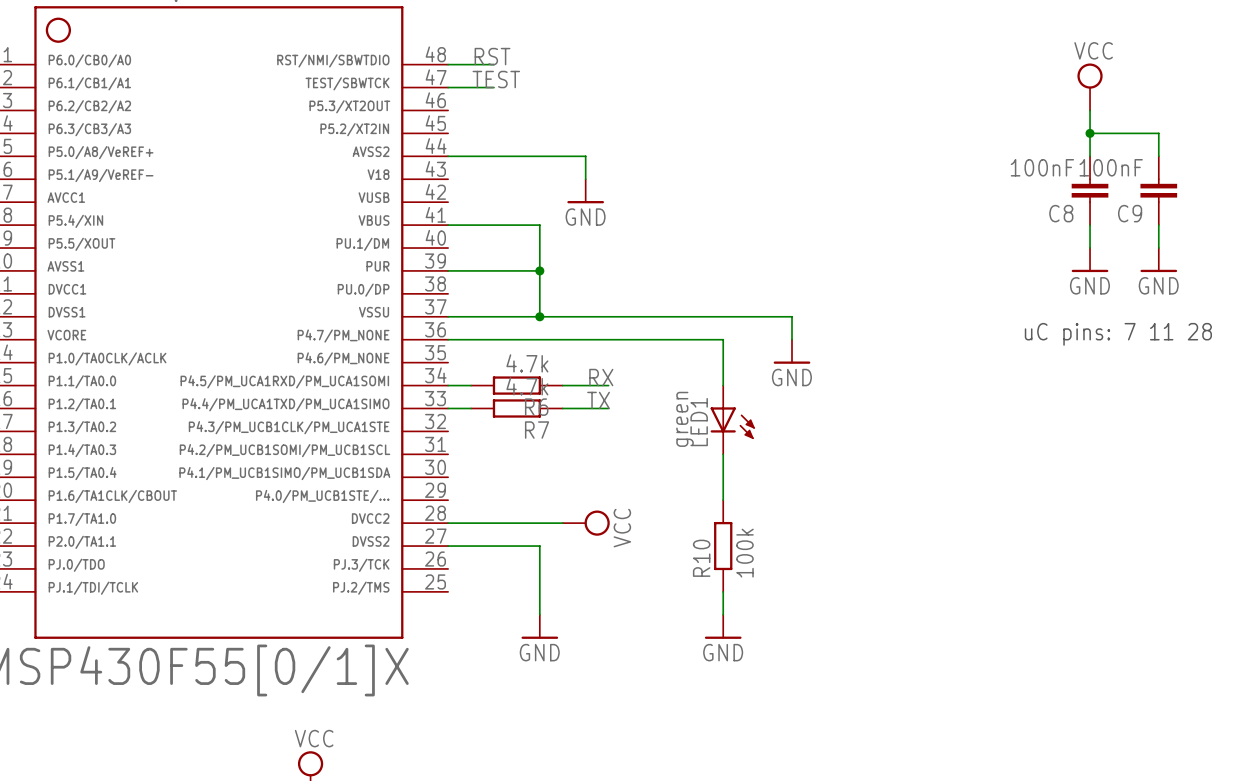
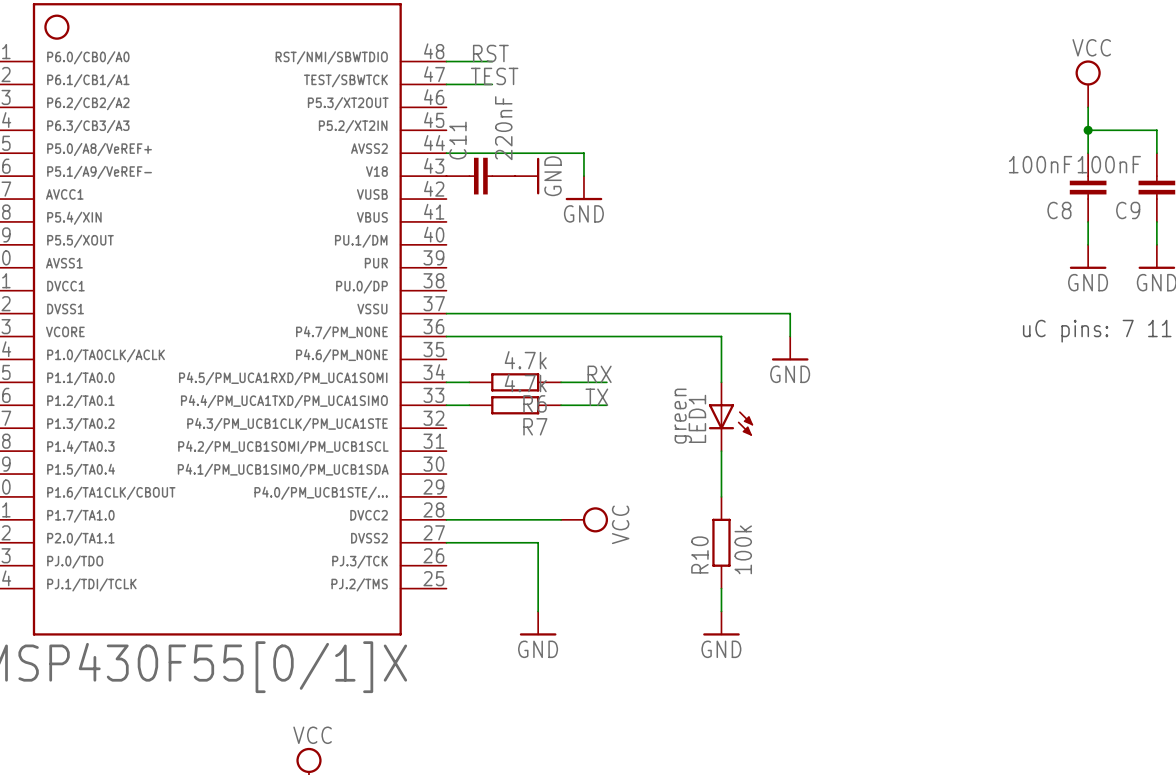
C11: none -> 220nF (480, 176)
power symbol: none -> GND (527, 176)
wire: (448, 225) (539, 225) (539, 316) -> none
wire: (448, 270) (539, 270) -> none
junction: (539, 270) -> none
junction: (539, 316) -> none

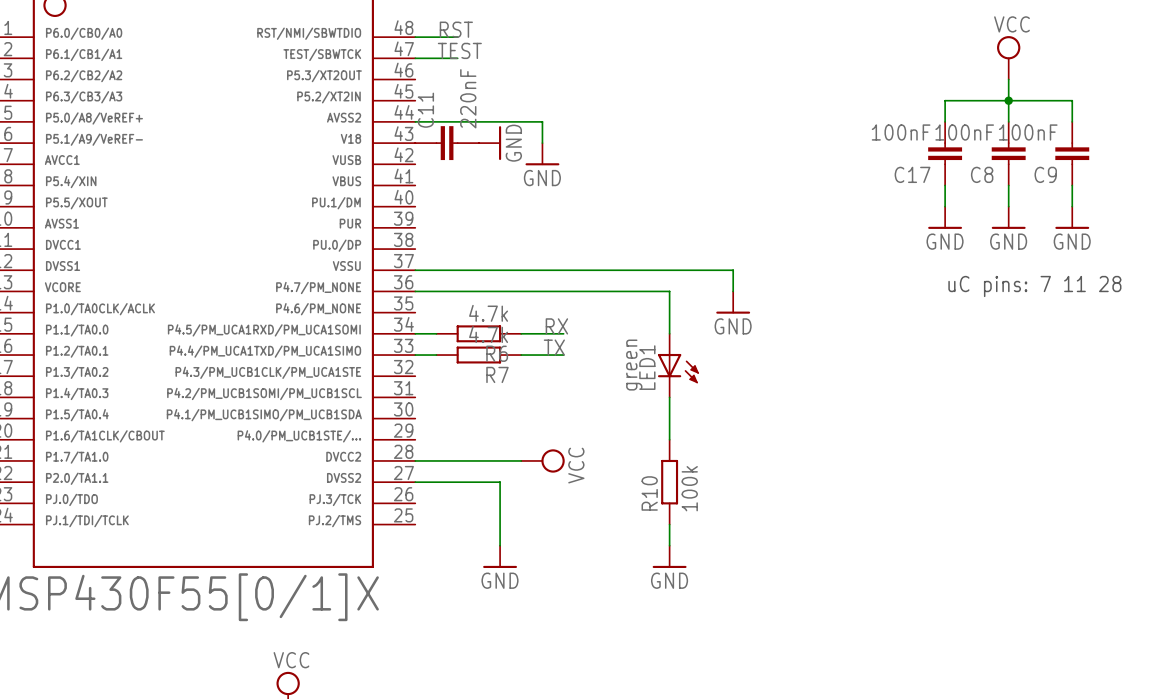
wire: none -> (1008, 100) (945, 100) (945, 121)
C17: none -> 100nF (945, 153)
wire: none -> (945, 185) (945, 206)
power symbol: none -> GND (945, 217)

